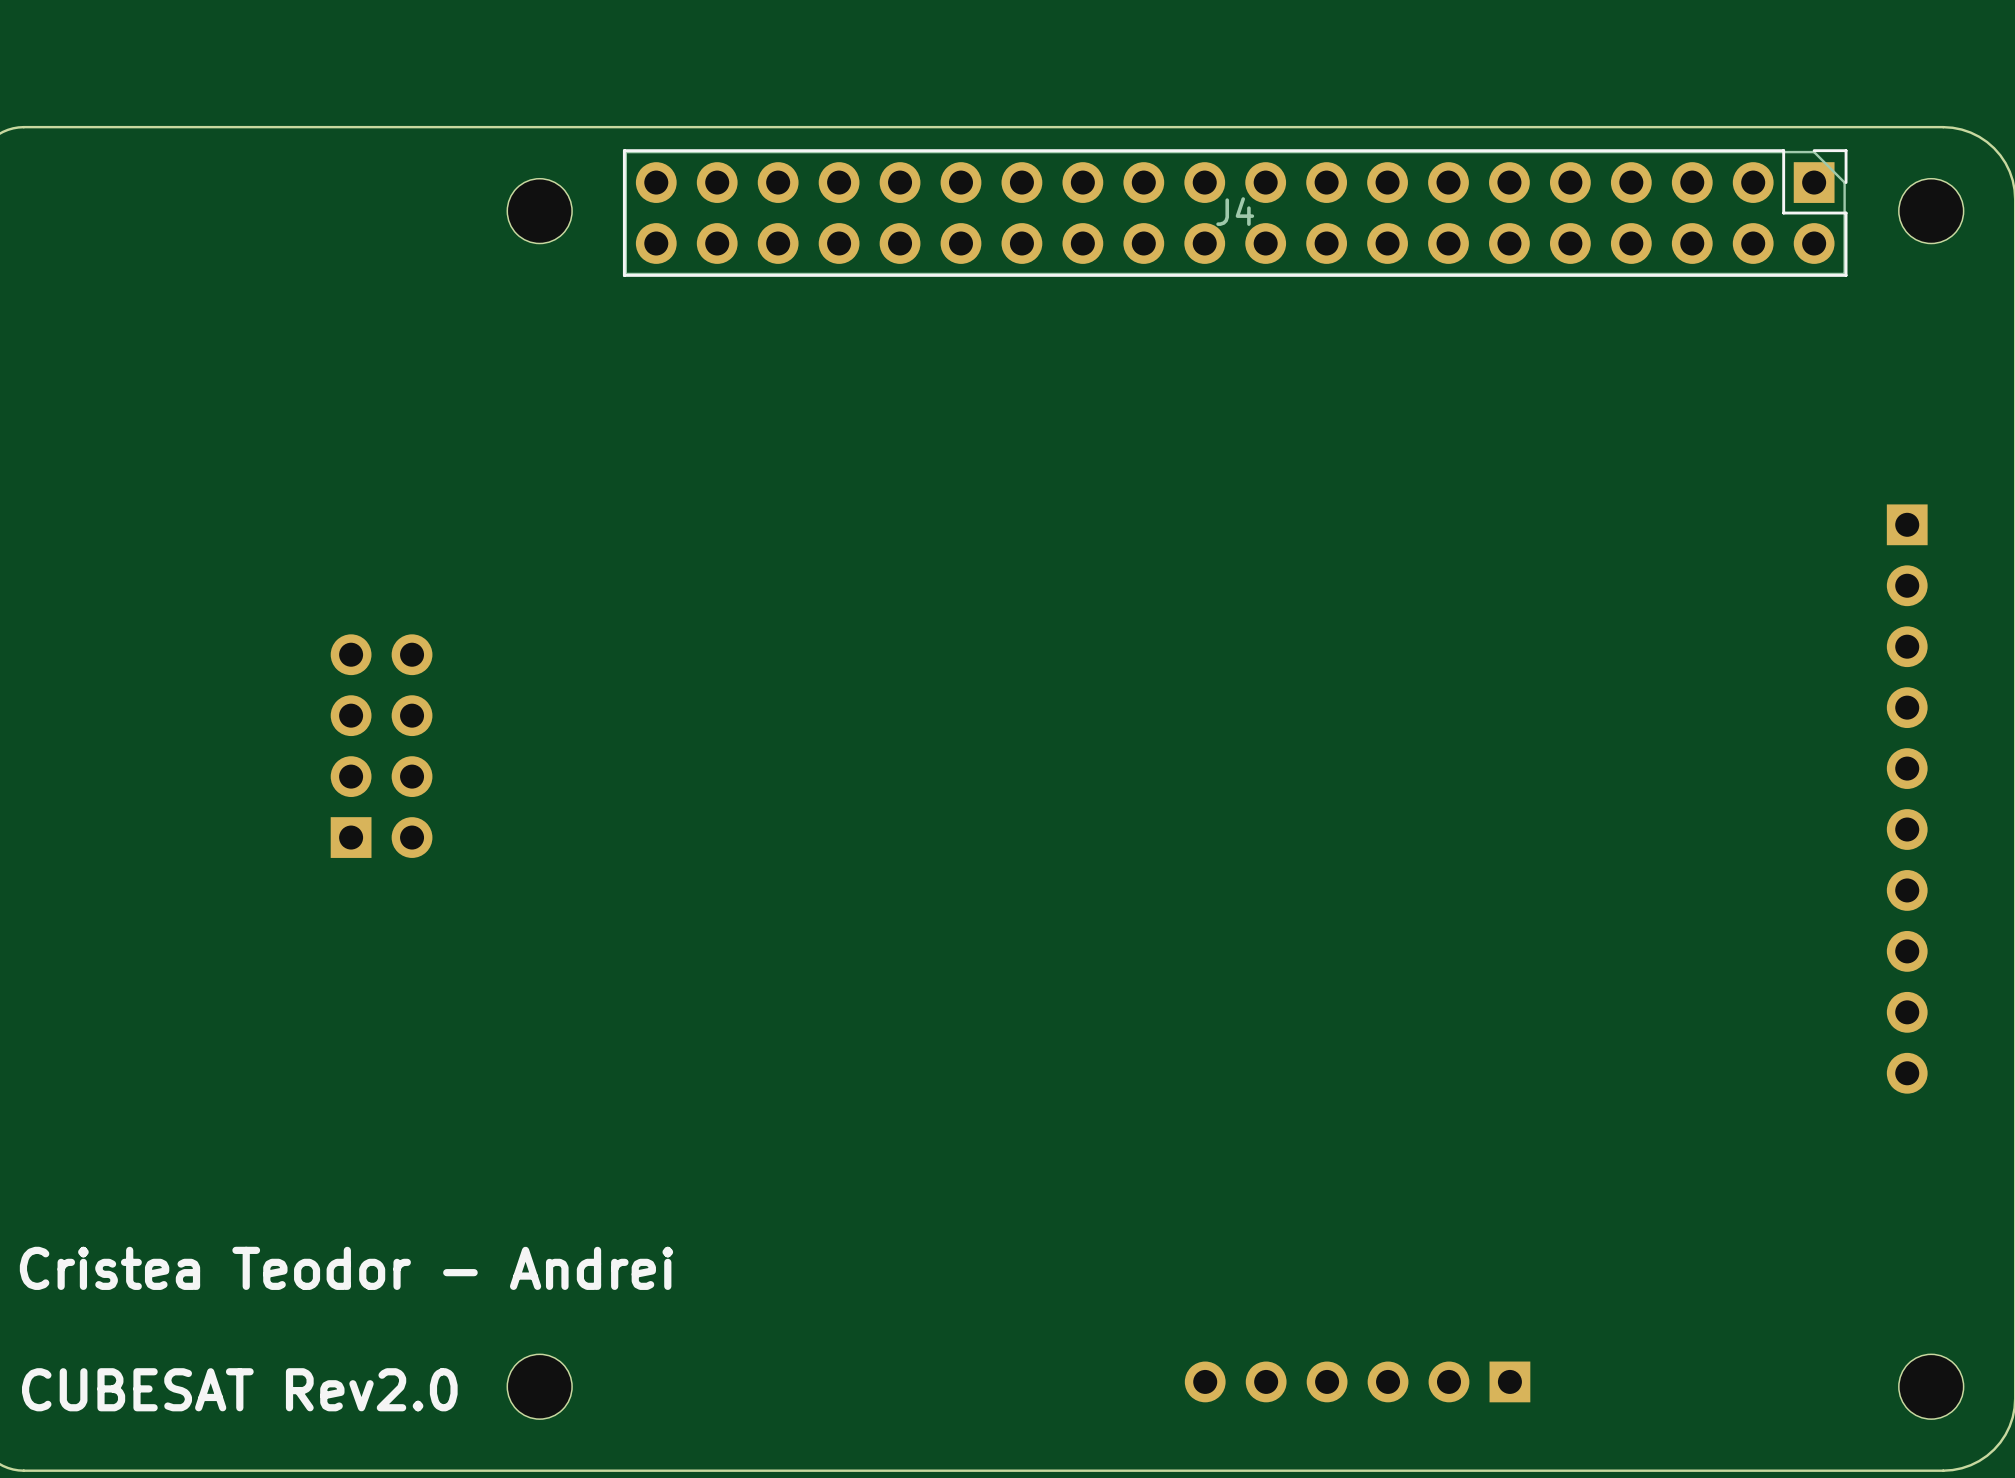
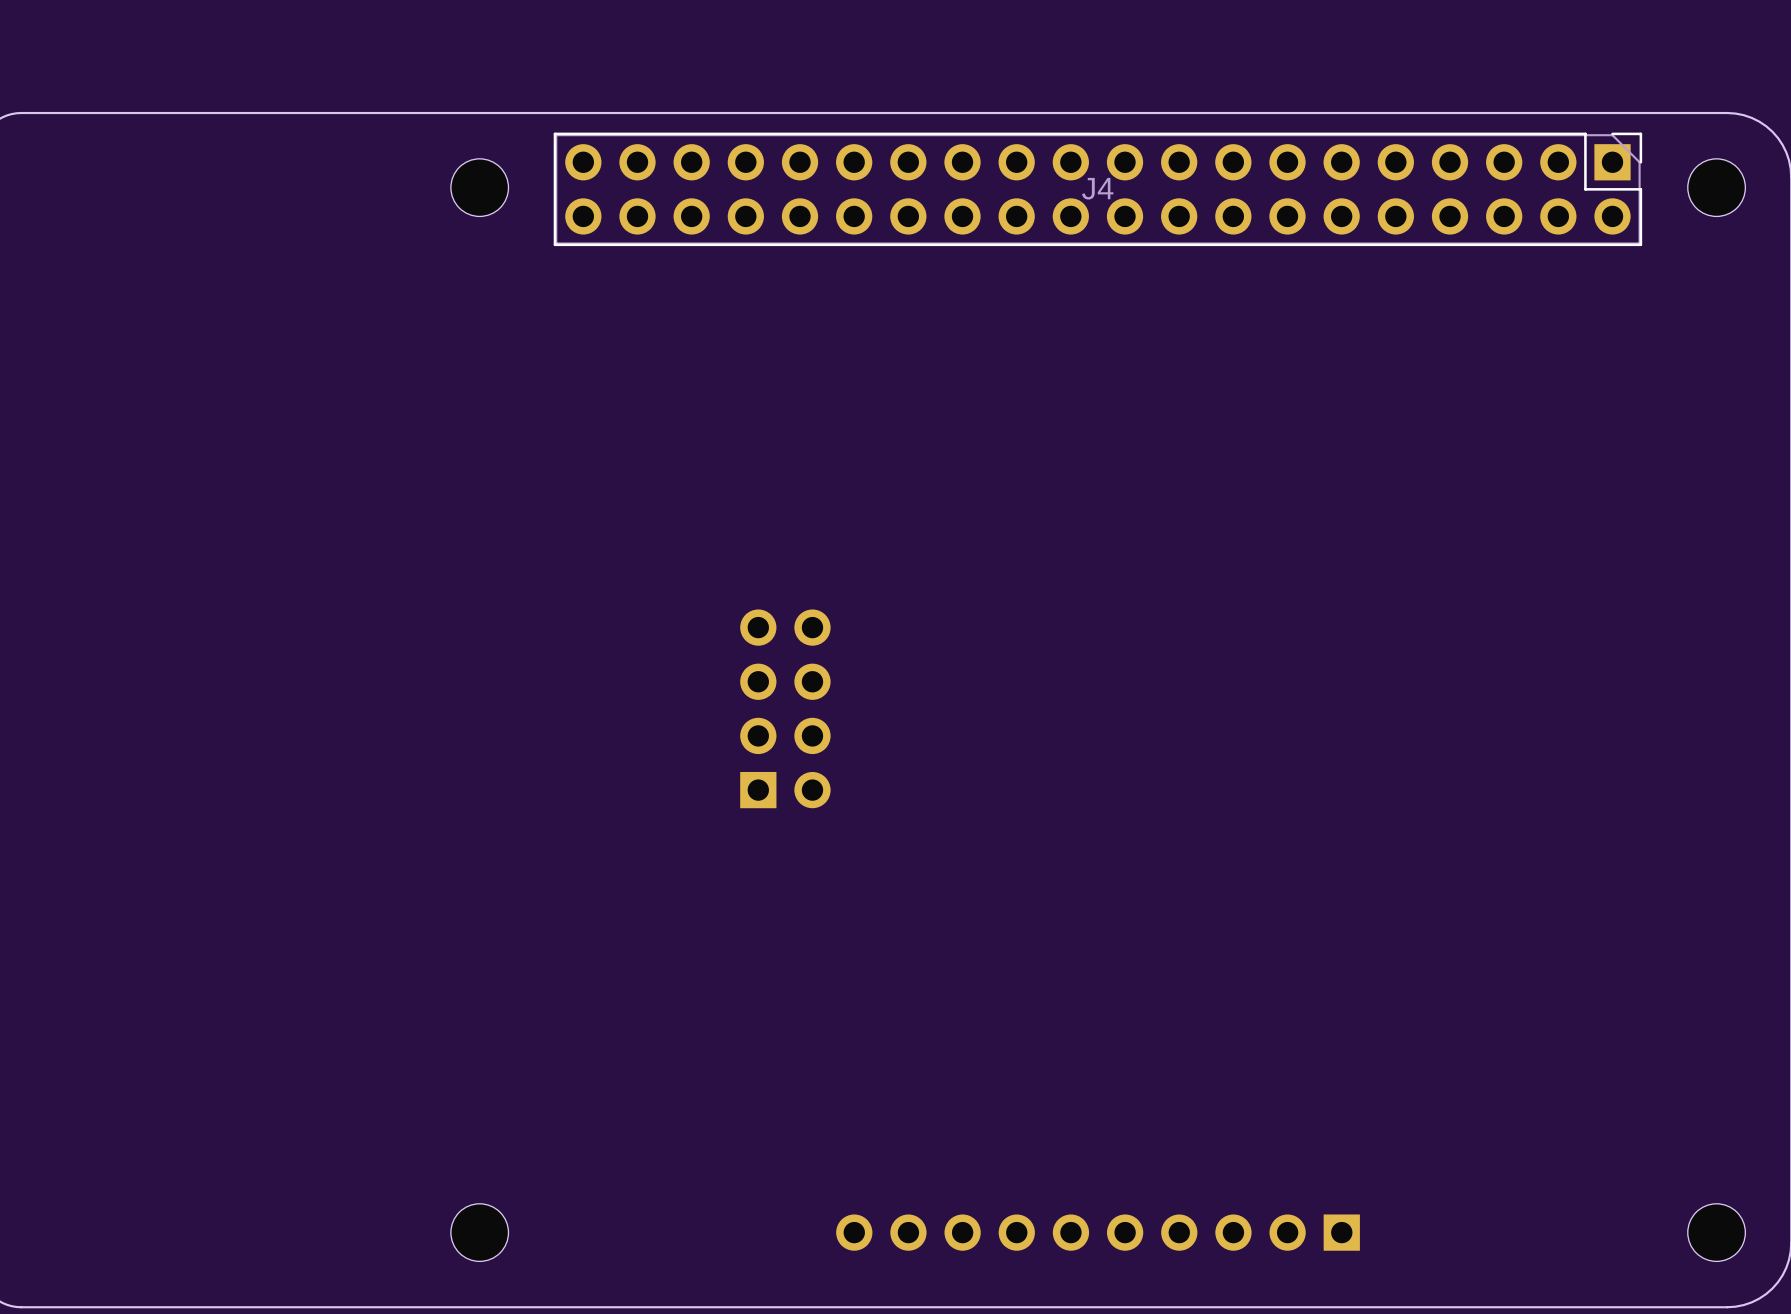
part position: (381, 746) -> (785, 708)
part: (1907, 799) -> none
text: Cristea Teodor - Andrei (346, 1268) -> none
part: (1357, 1381) -> none
part: none -> (1098, 1232)
text: CUBESAT Rev2.0 (239, 1389) -> none

